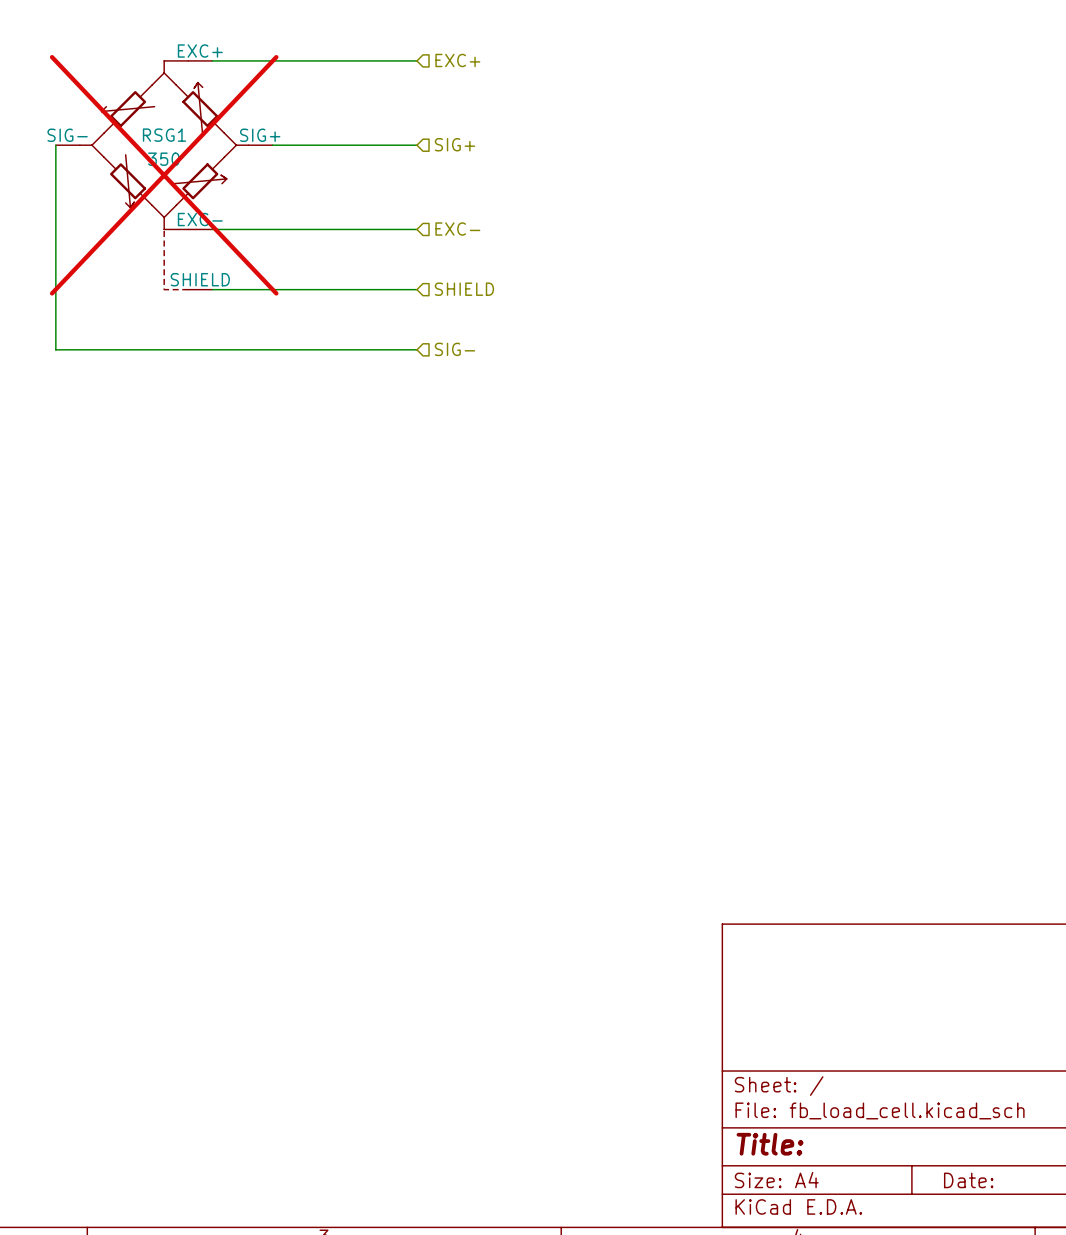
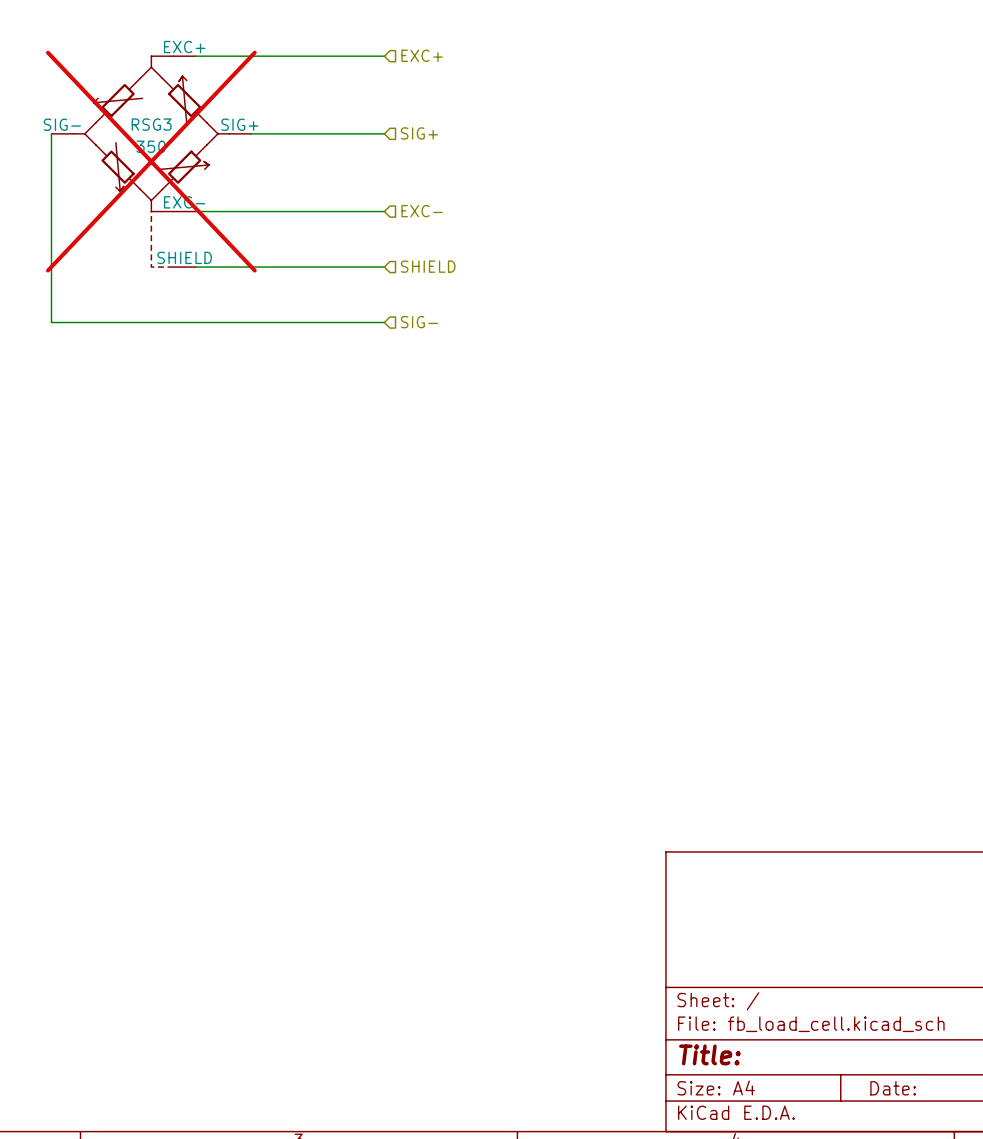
RSG1 name: RSG1 (164, 135) -> RSG3 (151, 124)

